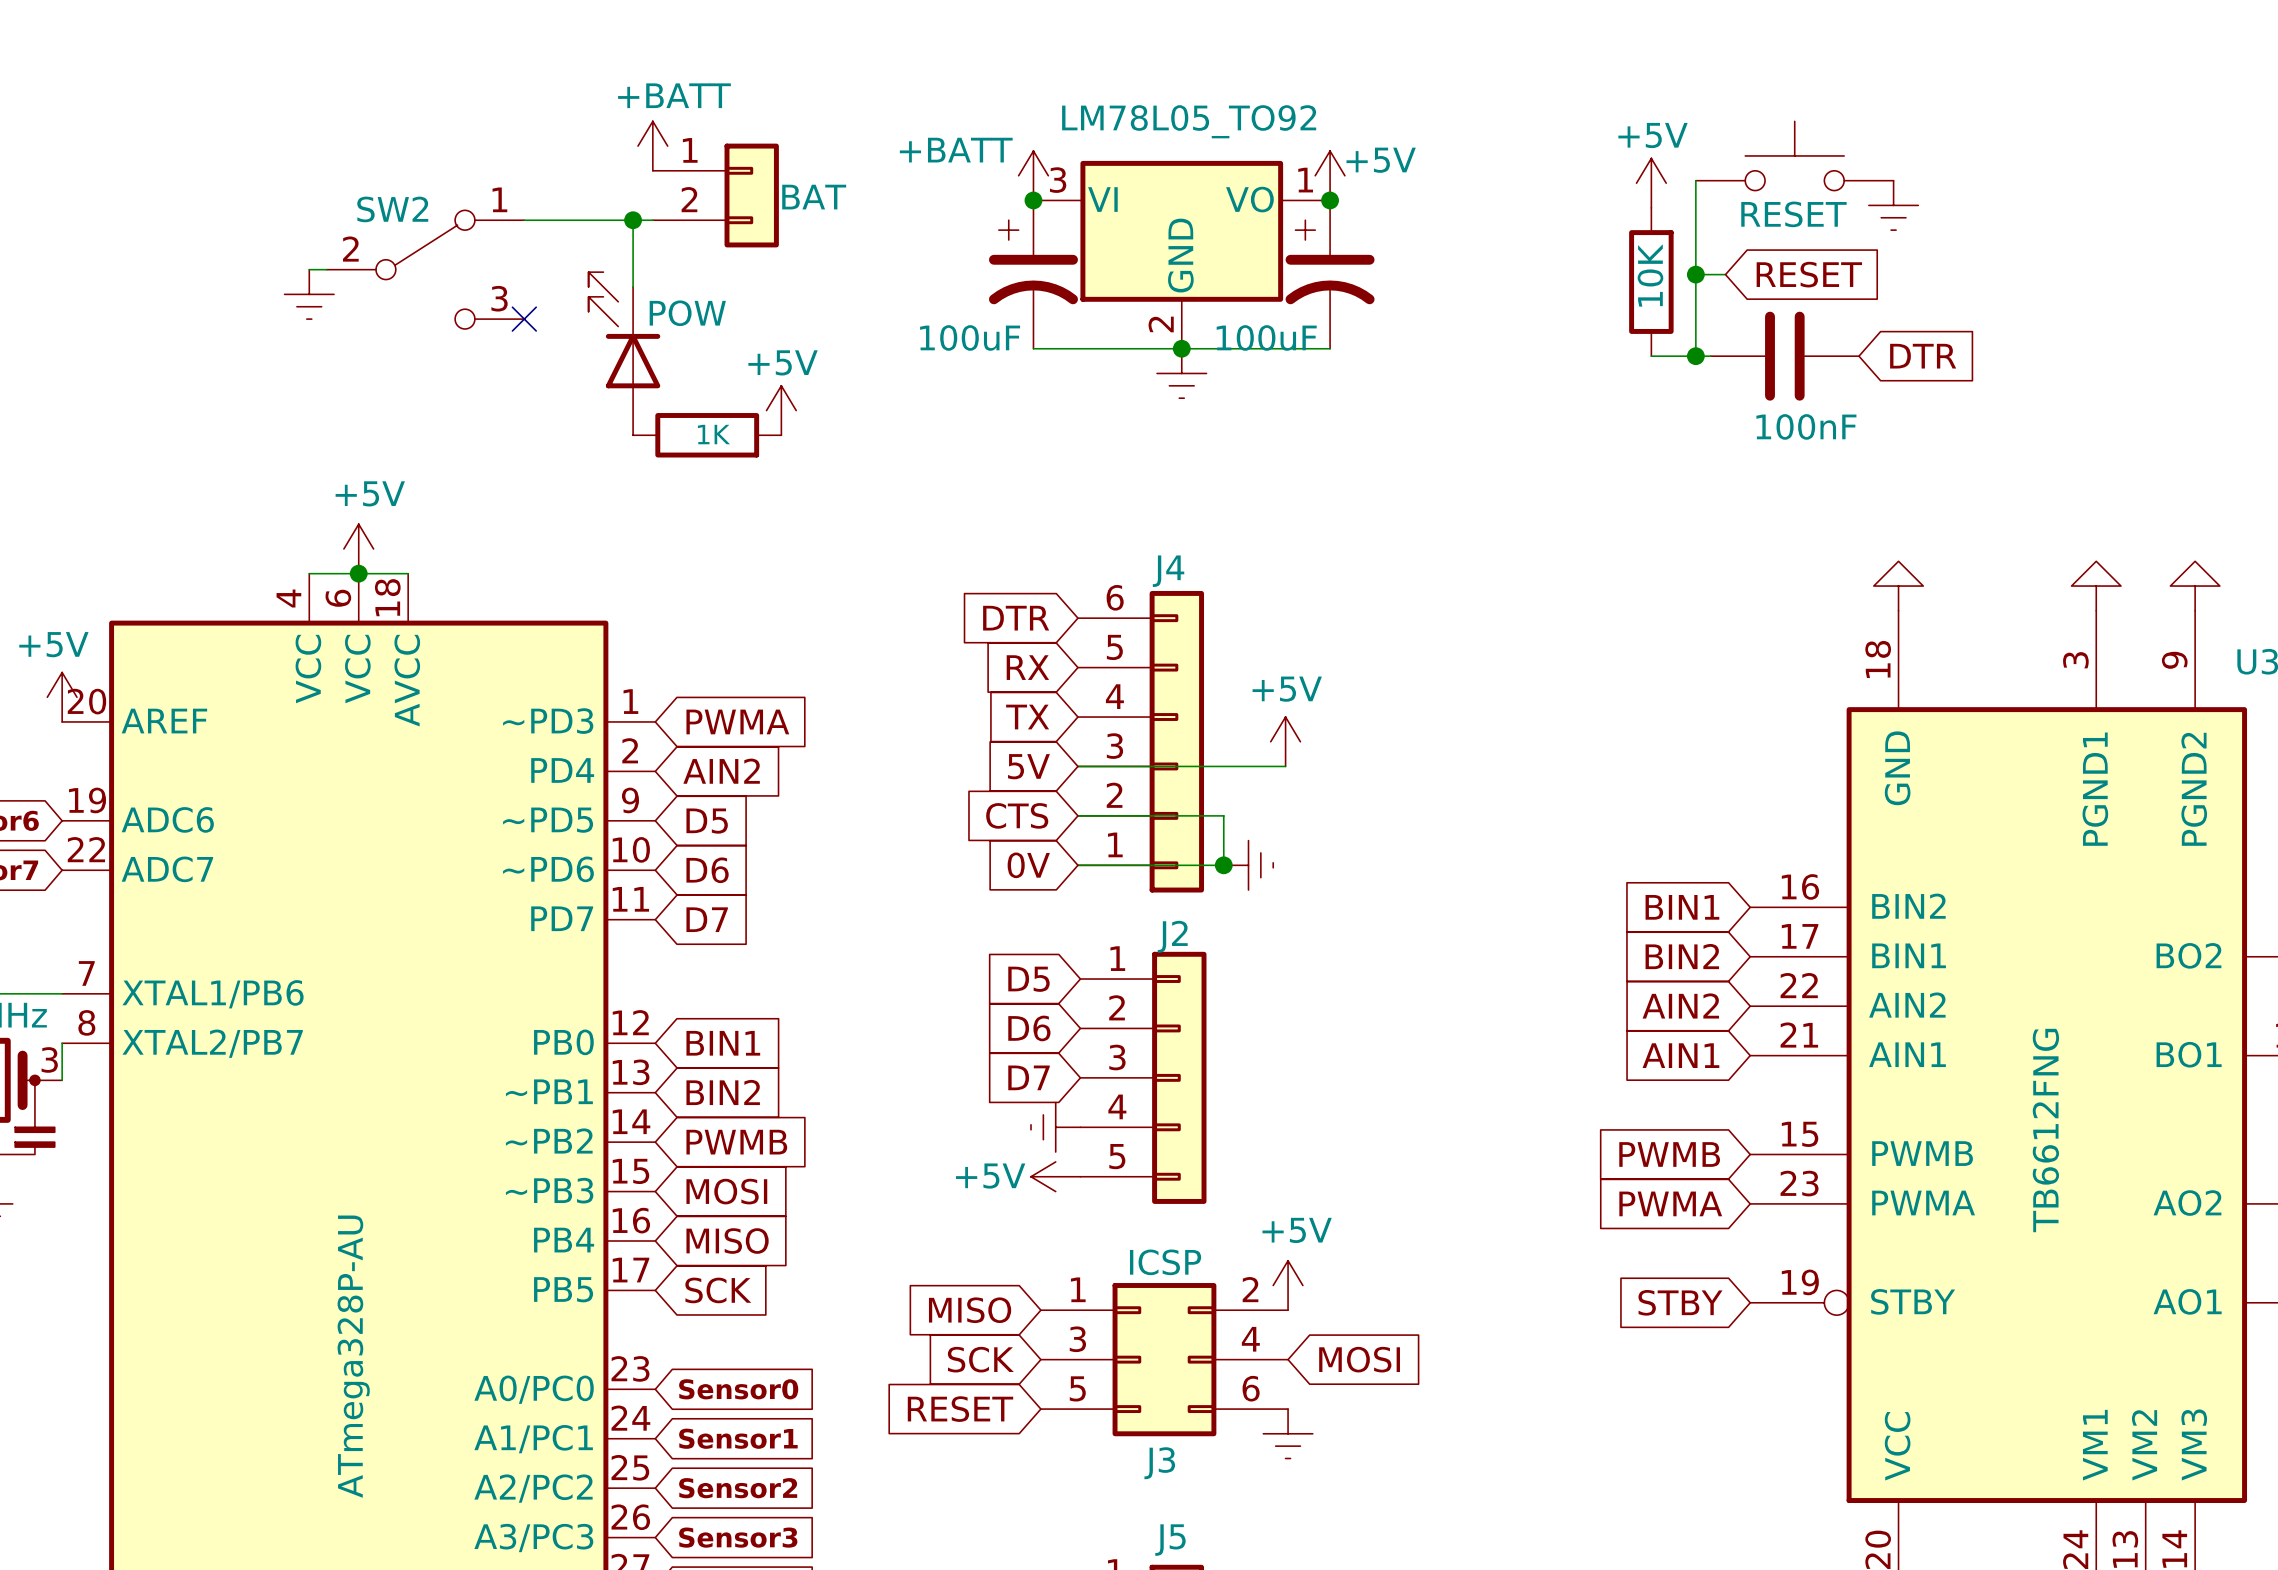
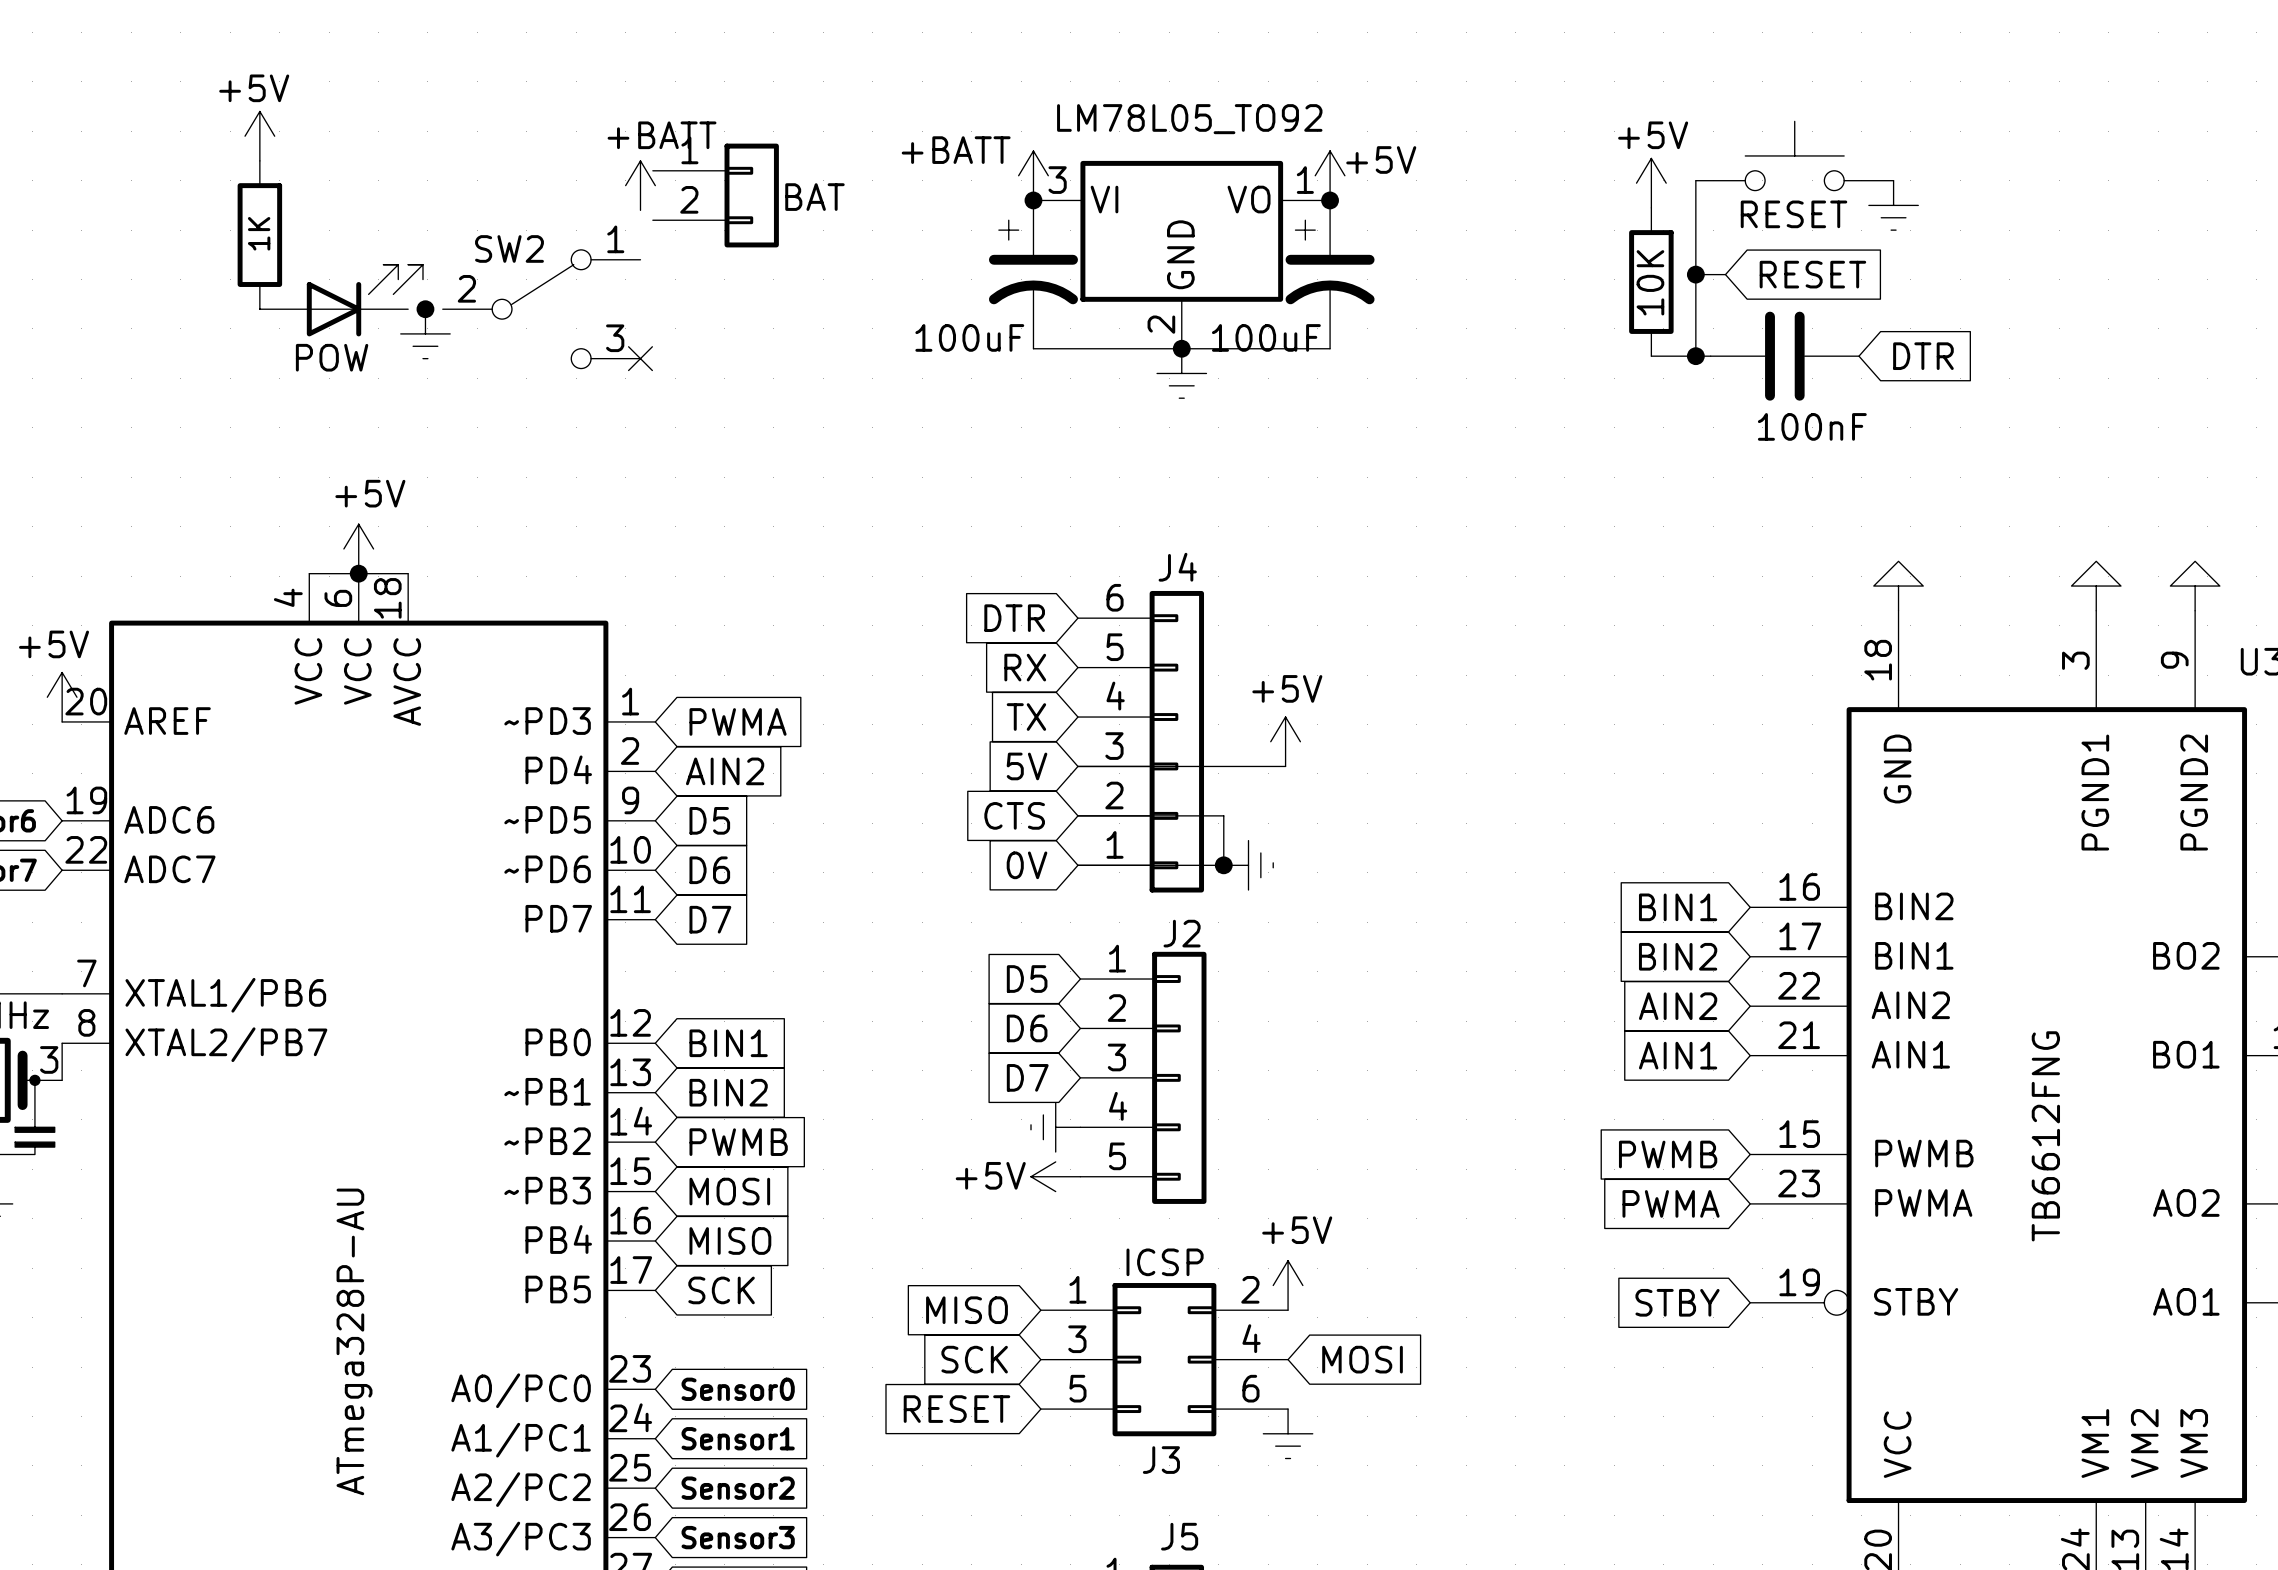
power symbol: none -> +5V (259, 136)
power symbol position: +BATT (652, 146) -> +BATT (640, 185)
wire: (524, 220) (652, 220) -> none
wire: (633, 220) (633, 286) -> none
junction: (633, 220) -> none
part: none -> 1K (259, 235)
wire: (309, 269) (326, 269) -> none
SW2 position: (425, 269) -> (541, 309)
power symbol position: (309, 294) -> (425, 333)
junction: none -> (425, 309)
part value position: POW (687, 313) -> POW (332, 357)
no-connect mark: (524, 319) -> none
part rotation: 0° (624, 330) -> 90° clockwise (364, 300)
part position: (624, 353) -> (341, 300)
no-connect mark: none -> (640, 358)
power symbol: +5V (781, 410) -> none
part: 1K (707, 435) -> none

